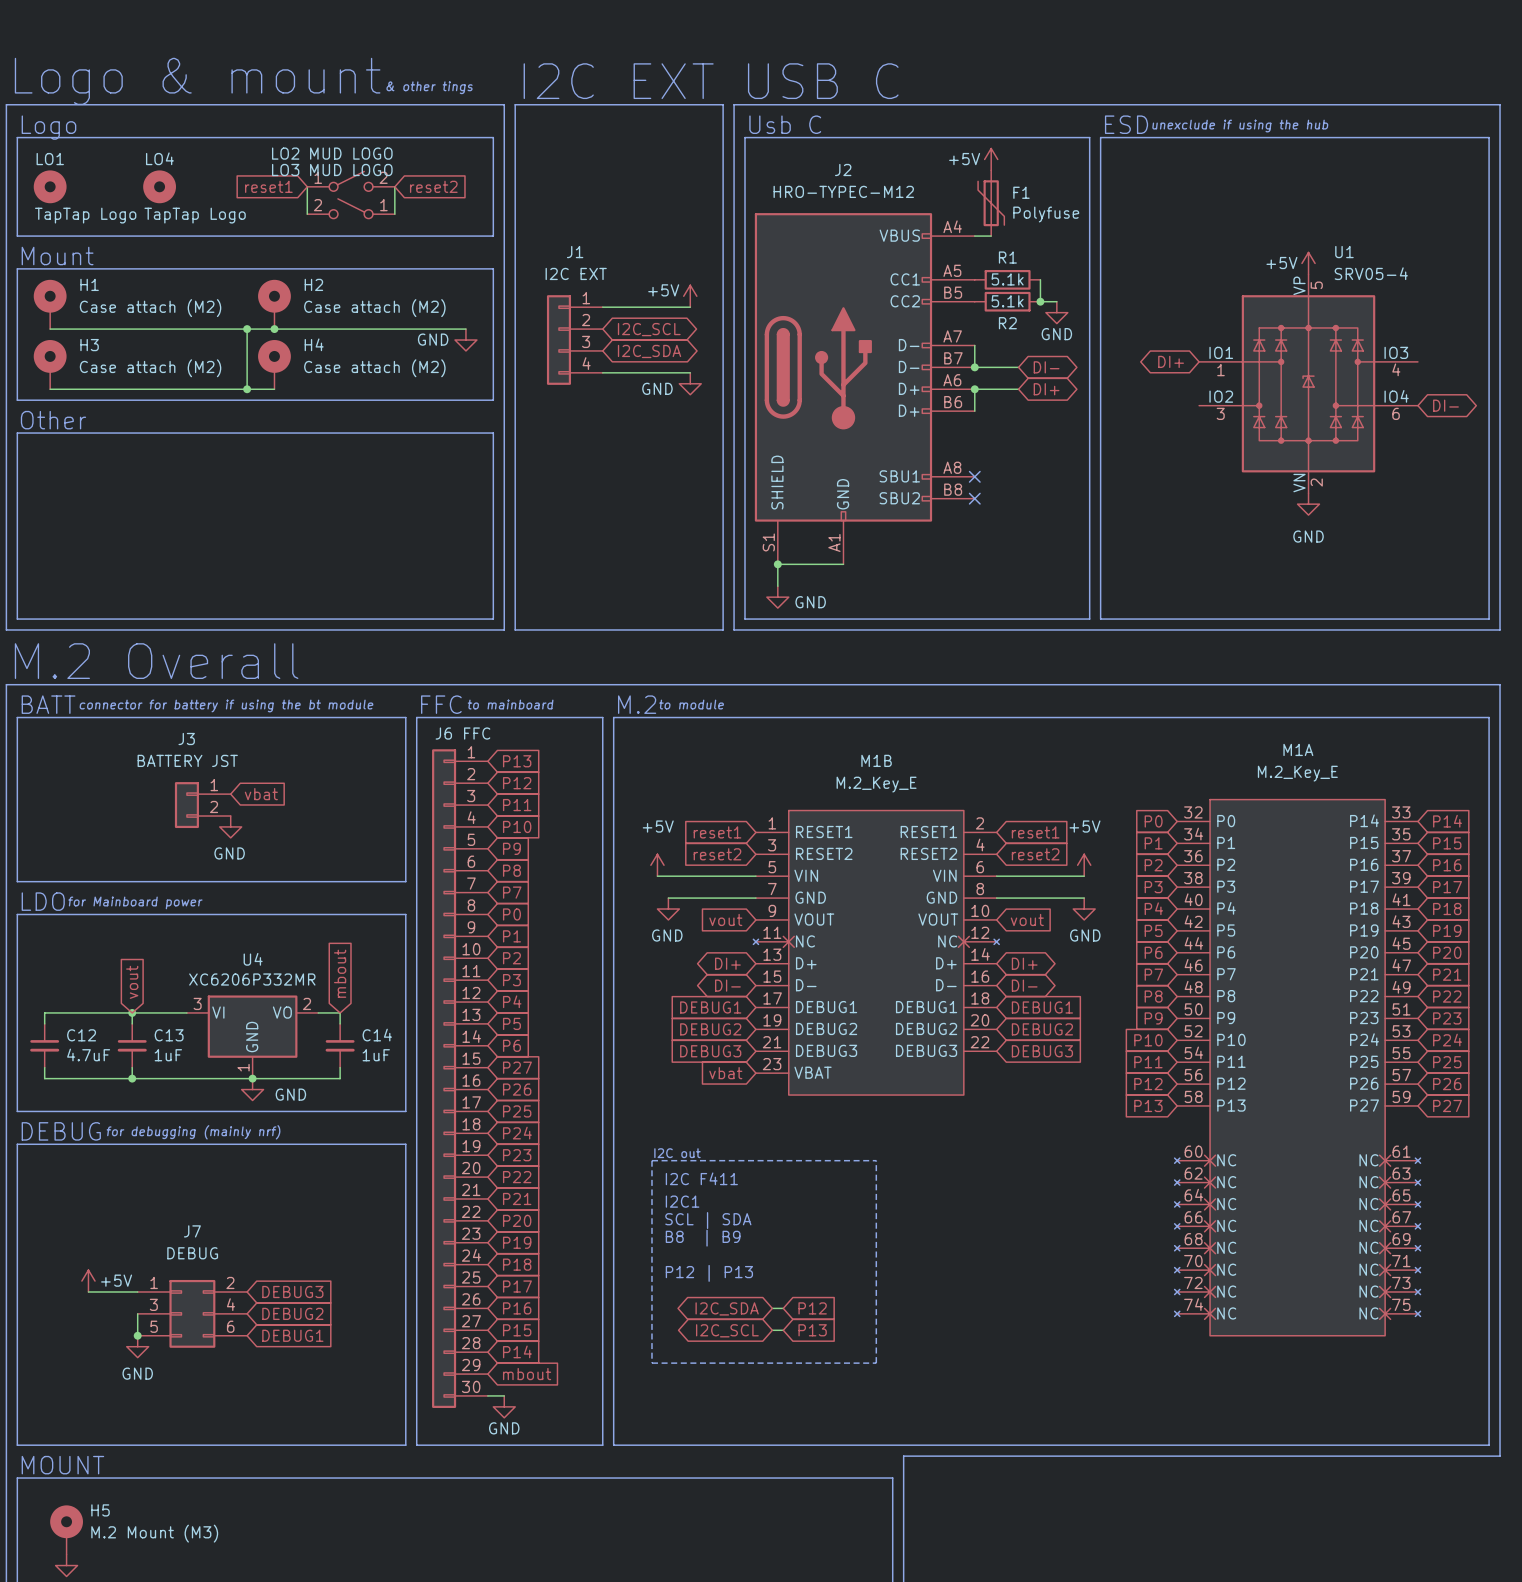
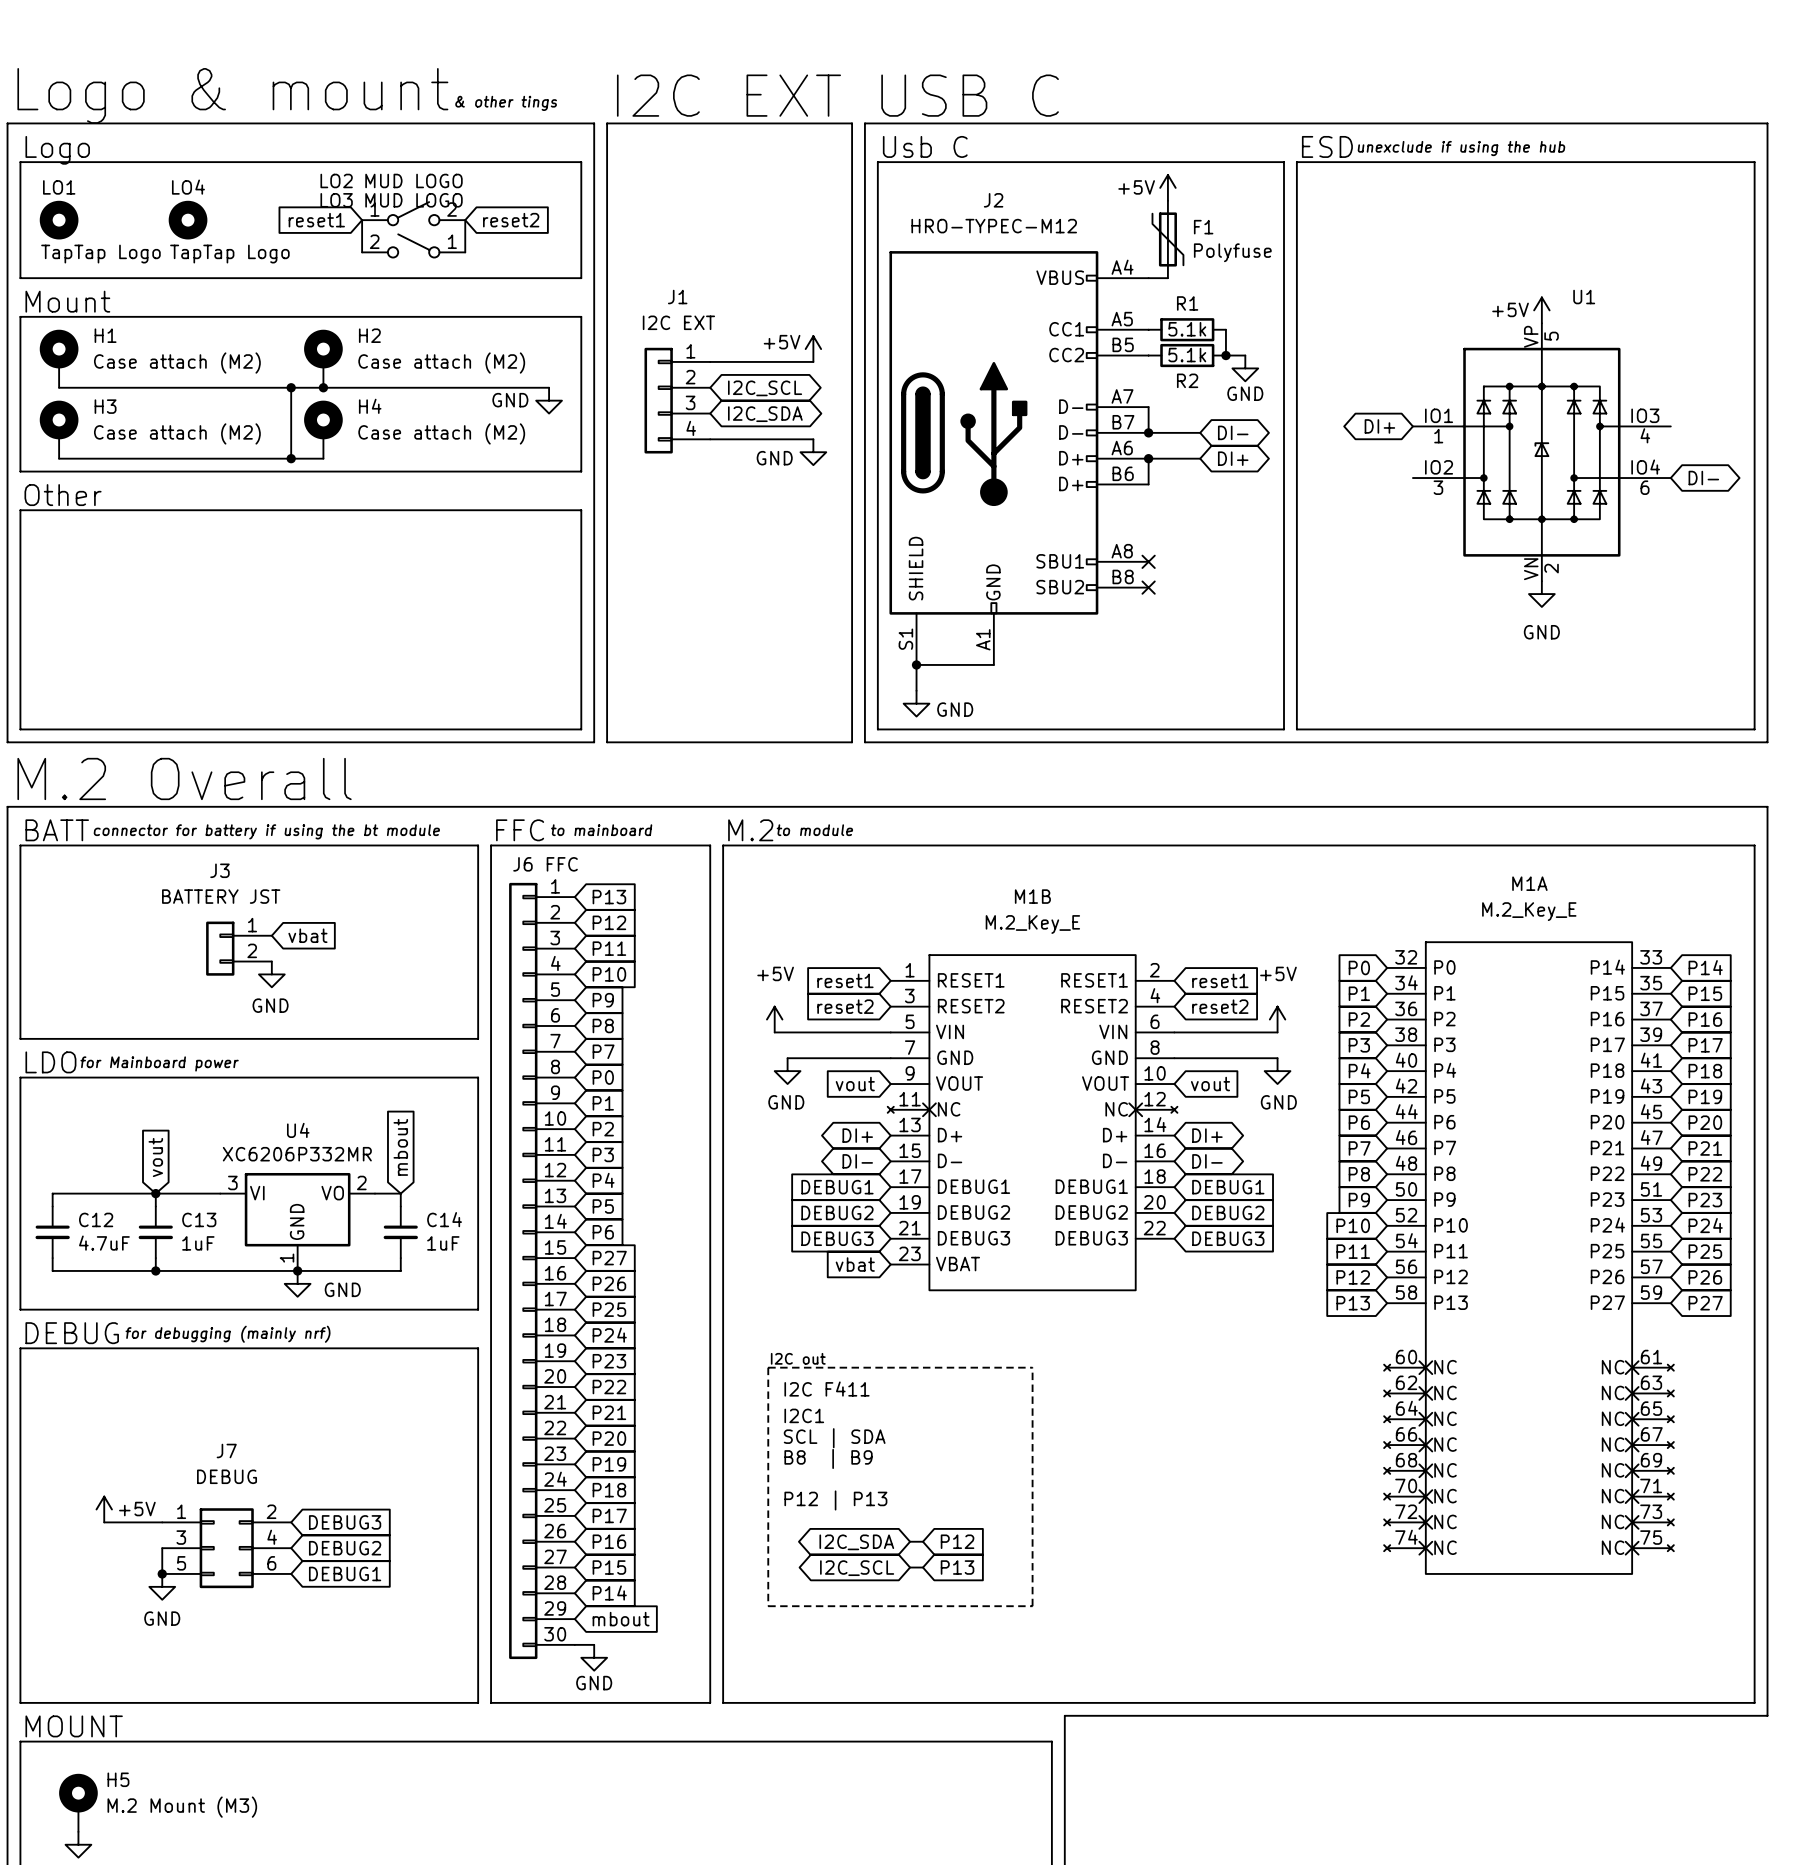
U1 value: SRV05-4 (1371, 273) -> none

